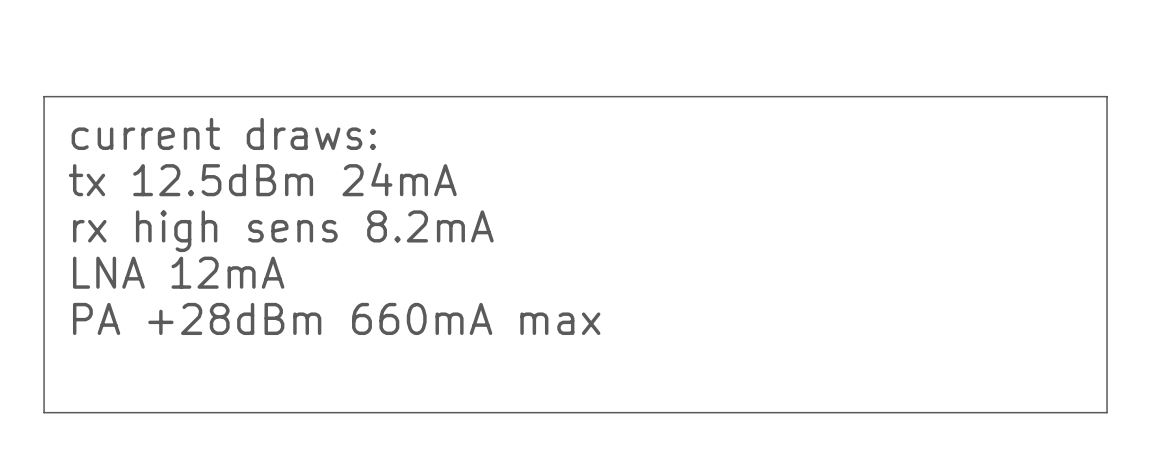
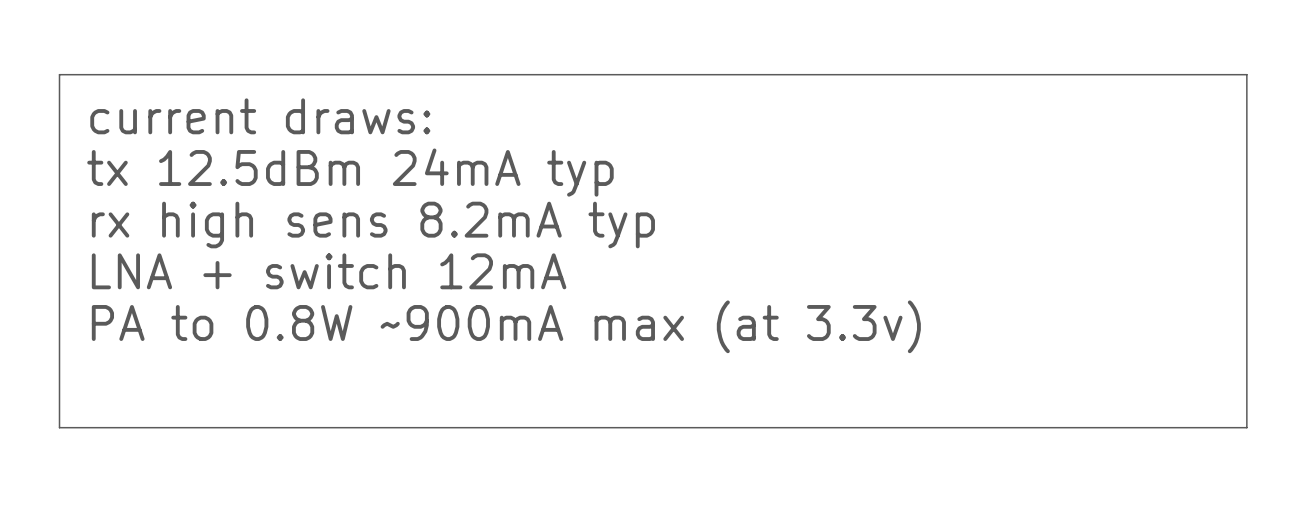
text: tx 12.5dBm 24mA (262, 179) -> tx 12.5dBm 24mA typ (350, 172)
text: rx high sens 8.2mA (283, 231) -> rx high sens 8.2mA typ (373, 225)
text: LNA 12mA (178, 272) -> LNA + switch 12mA (329, 271)
text: PA +28dBm 660mA max (336, 318) -> PA to 0.8W ~900mA max (at 3.3v) (506, 326)

